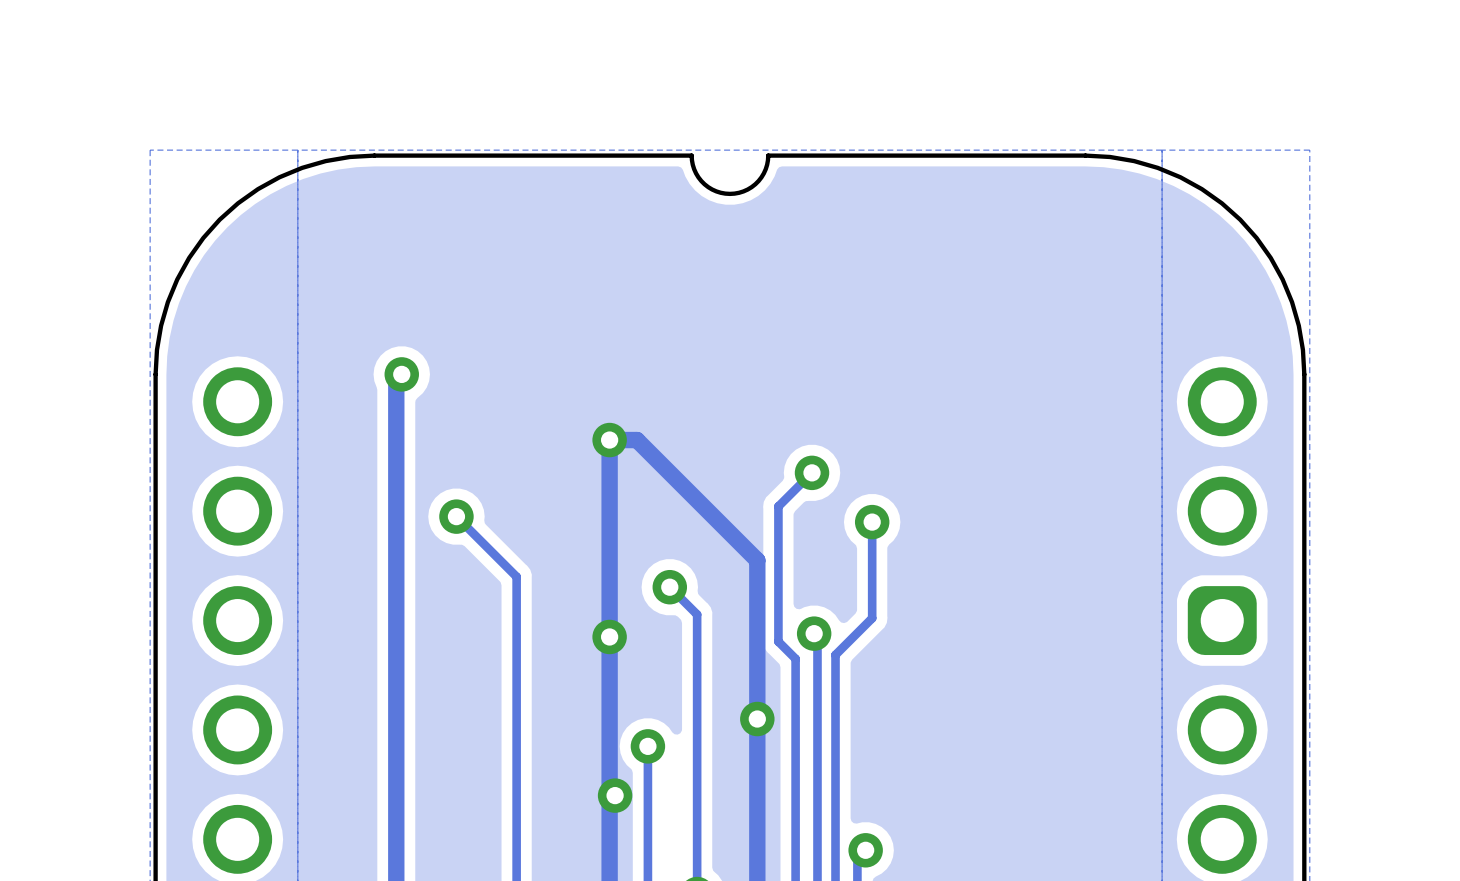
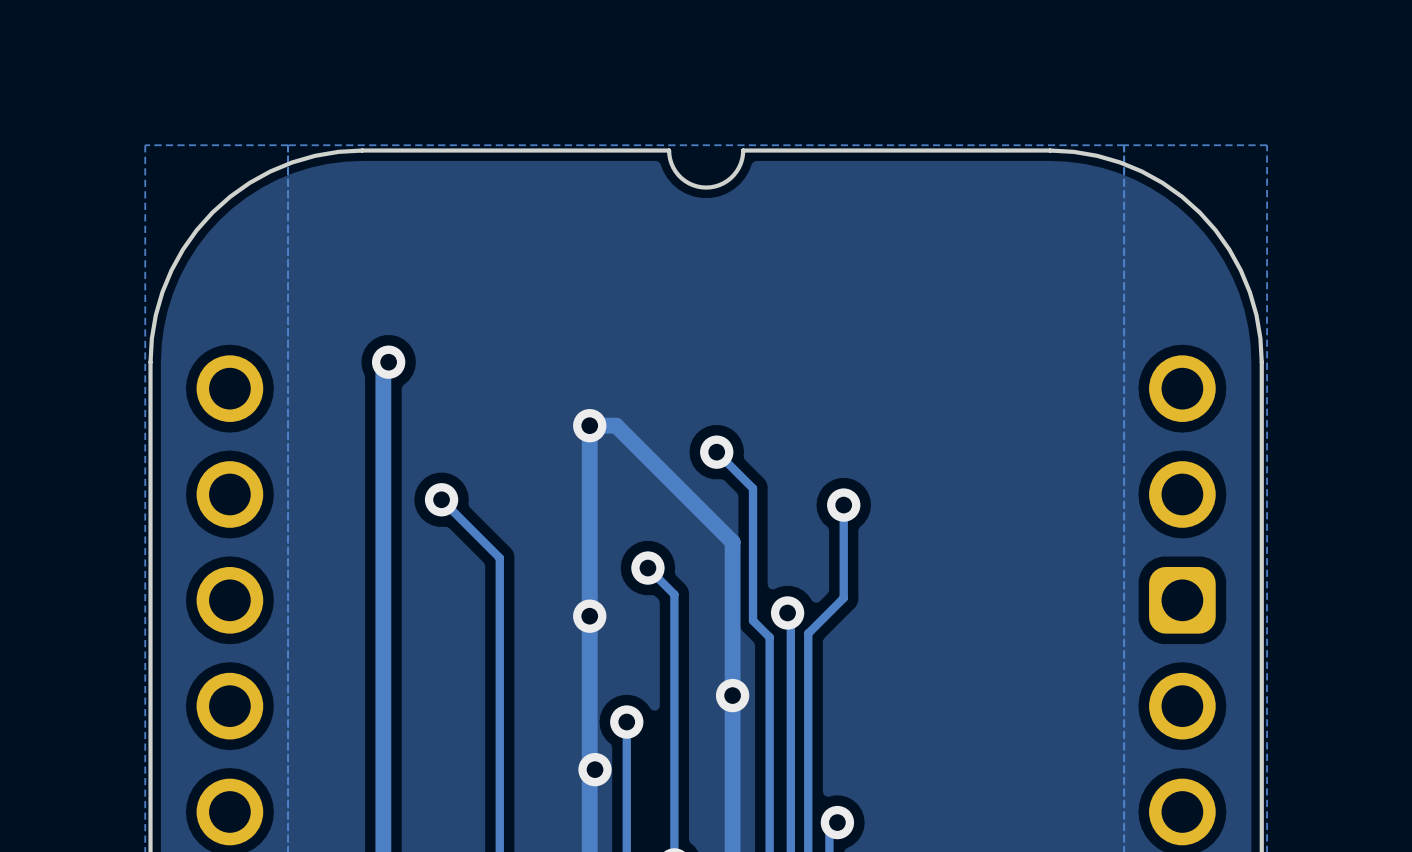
track: (812, 472) (778, 506) -> (716, 452) (753, 489)
via position: (812, 472) -> (716, 452)

